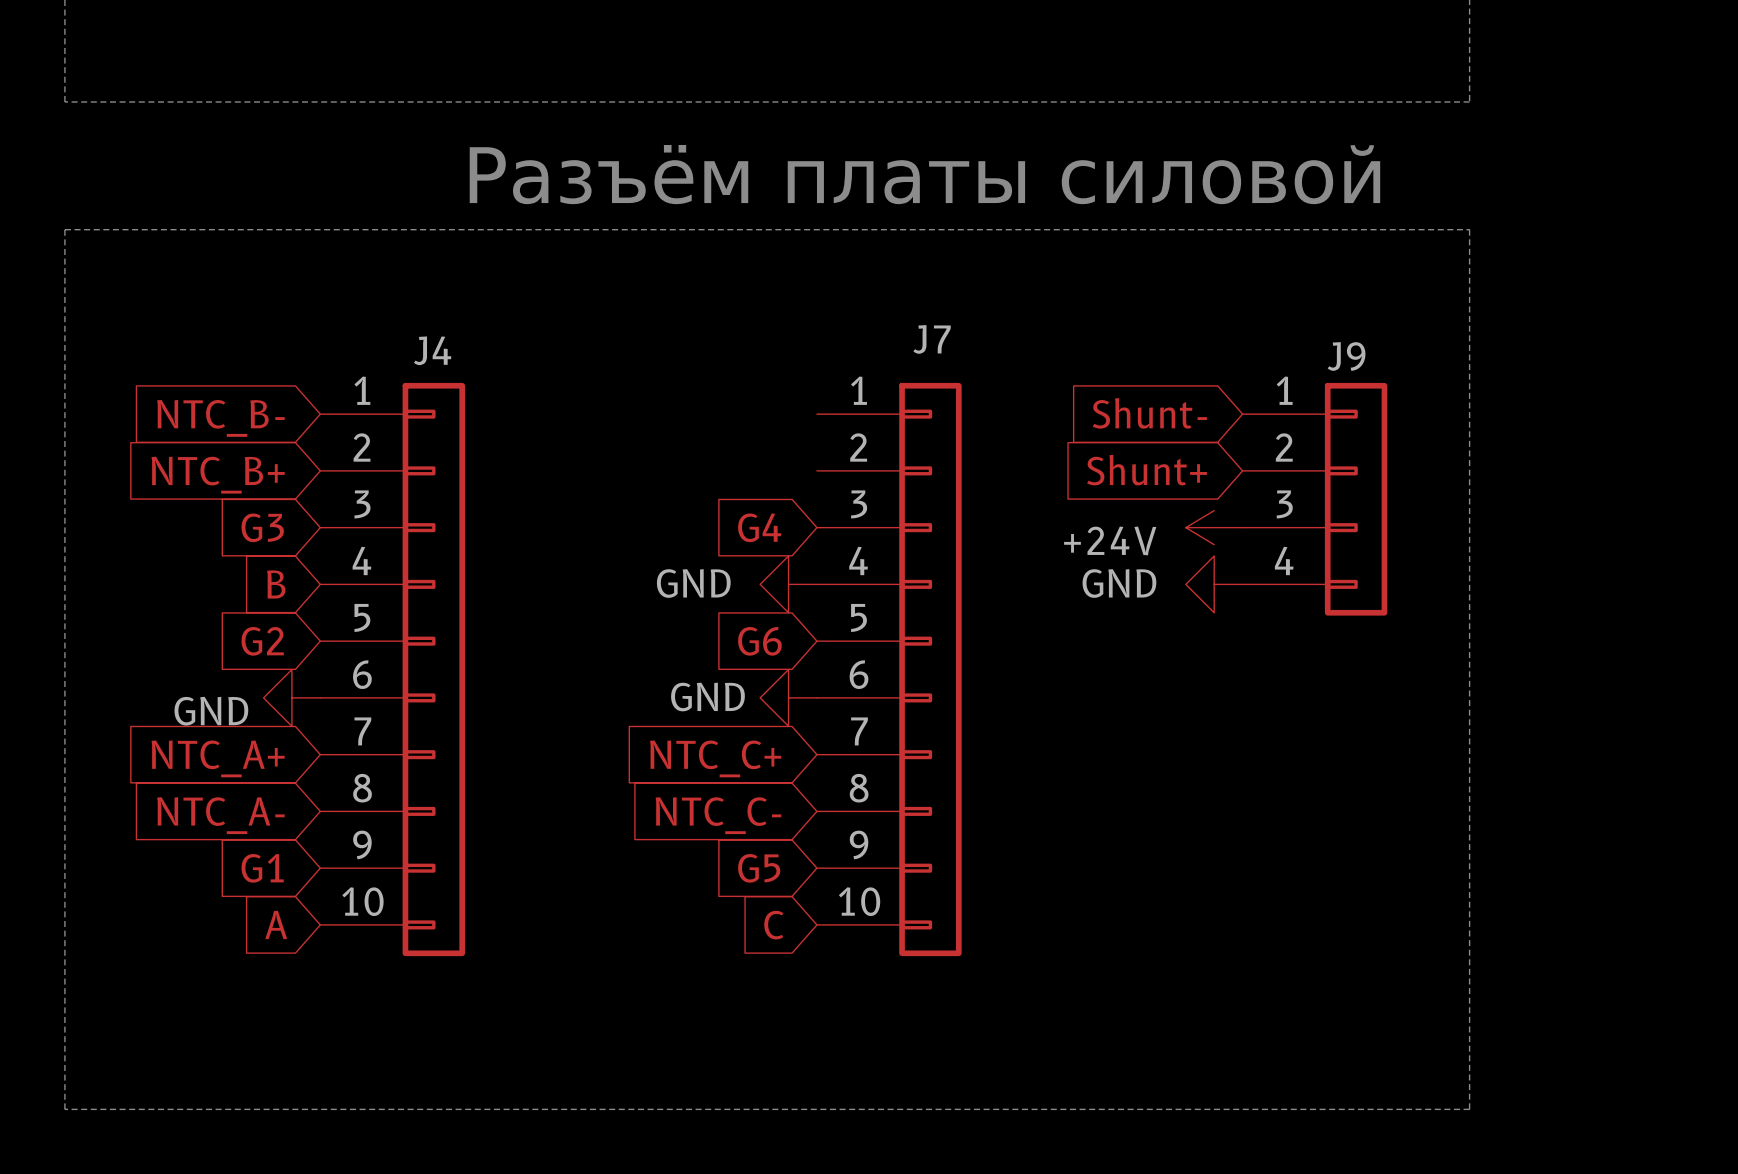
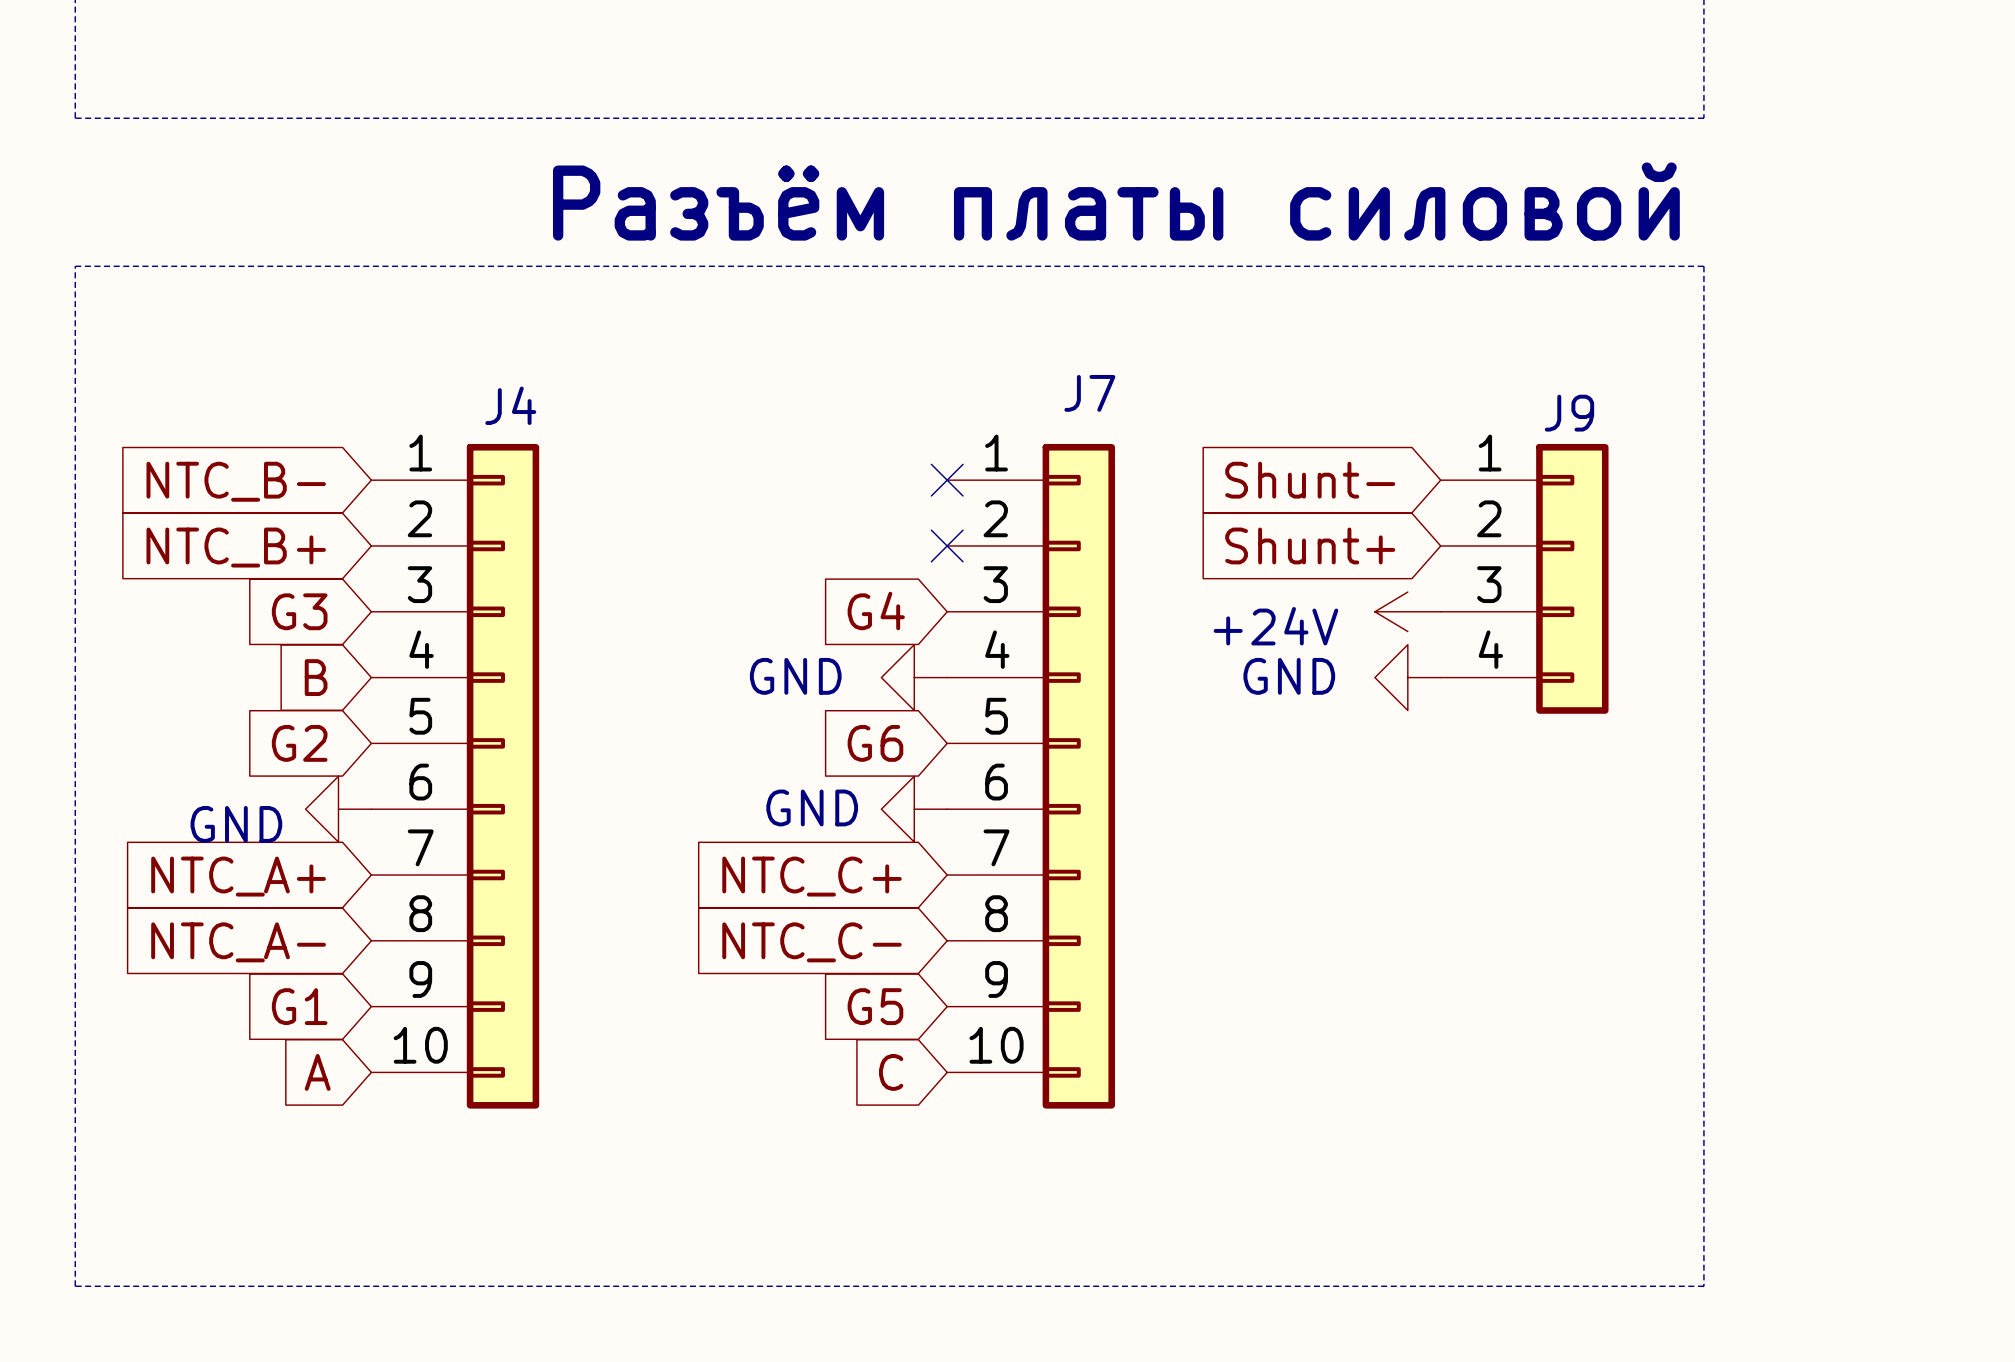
no-connect mark: none -> (947, 480)
no-connect mark: none -> (947, 545)

